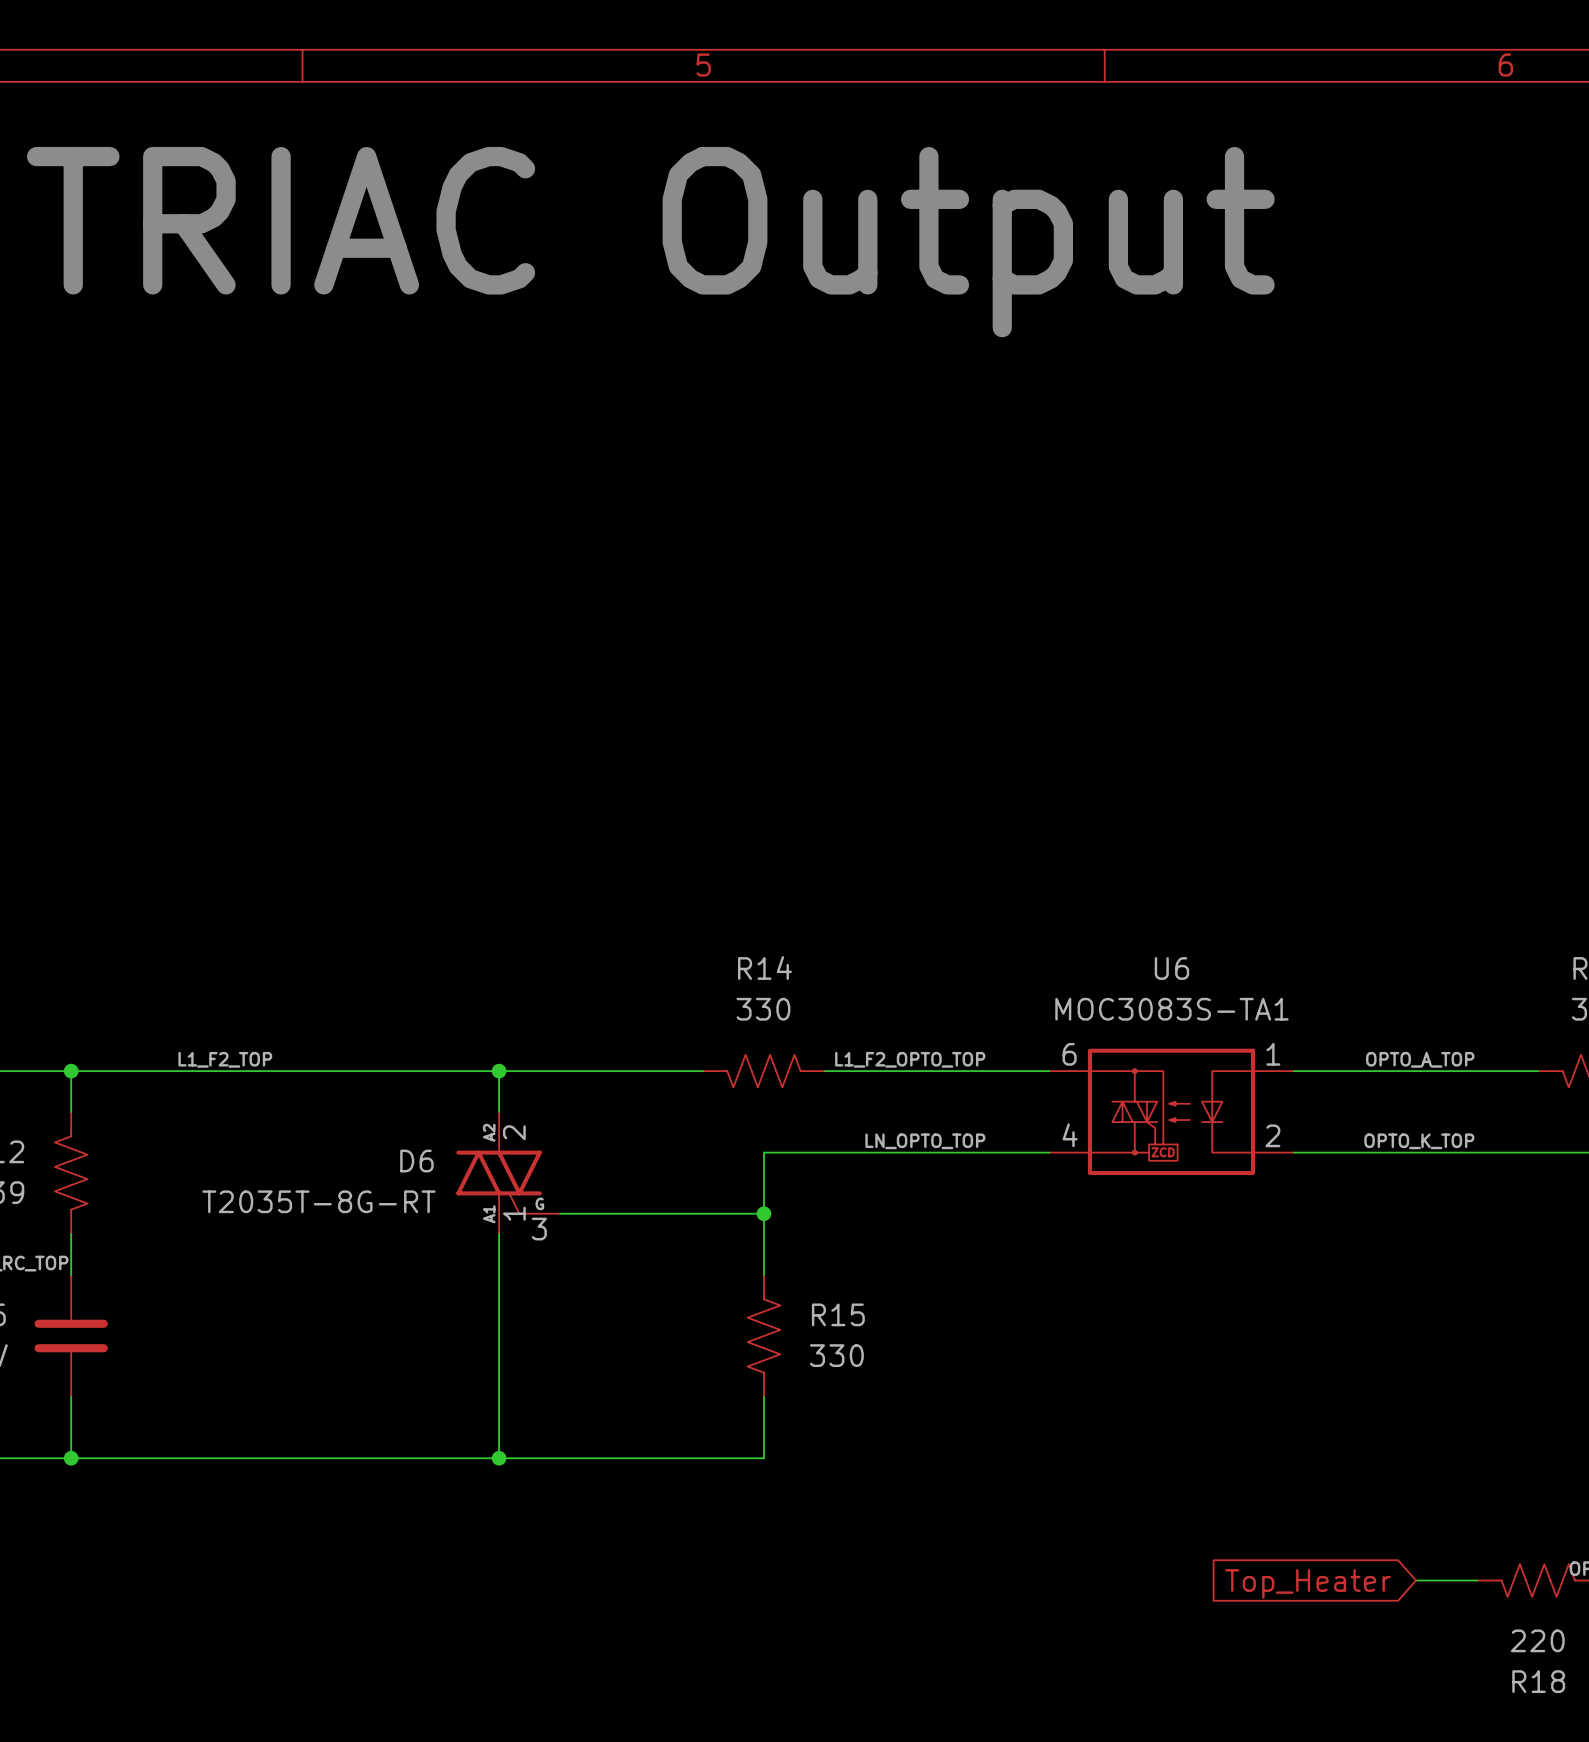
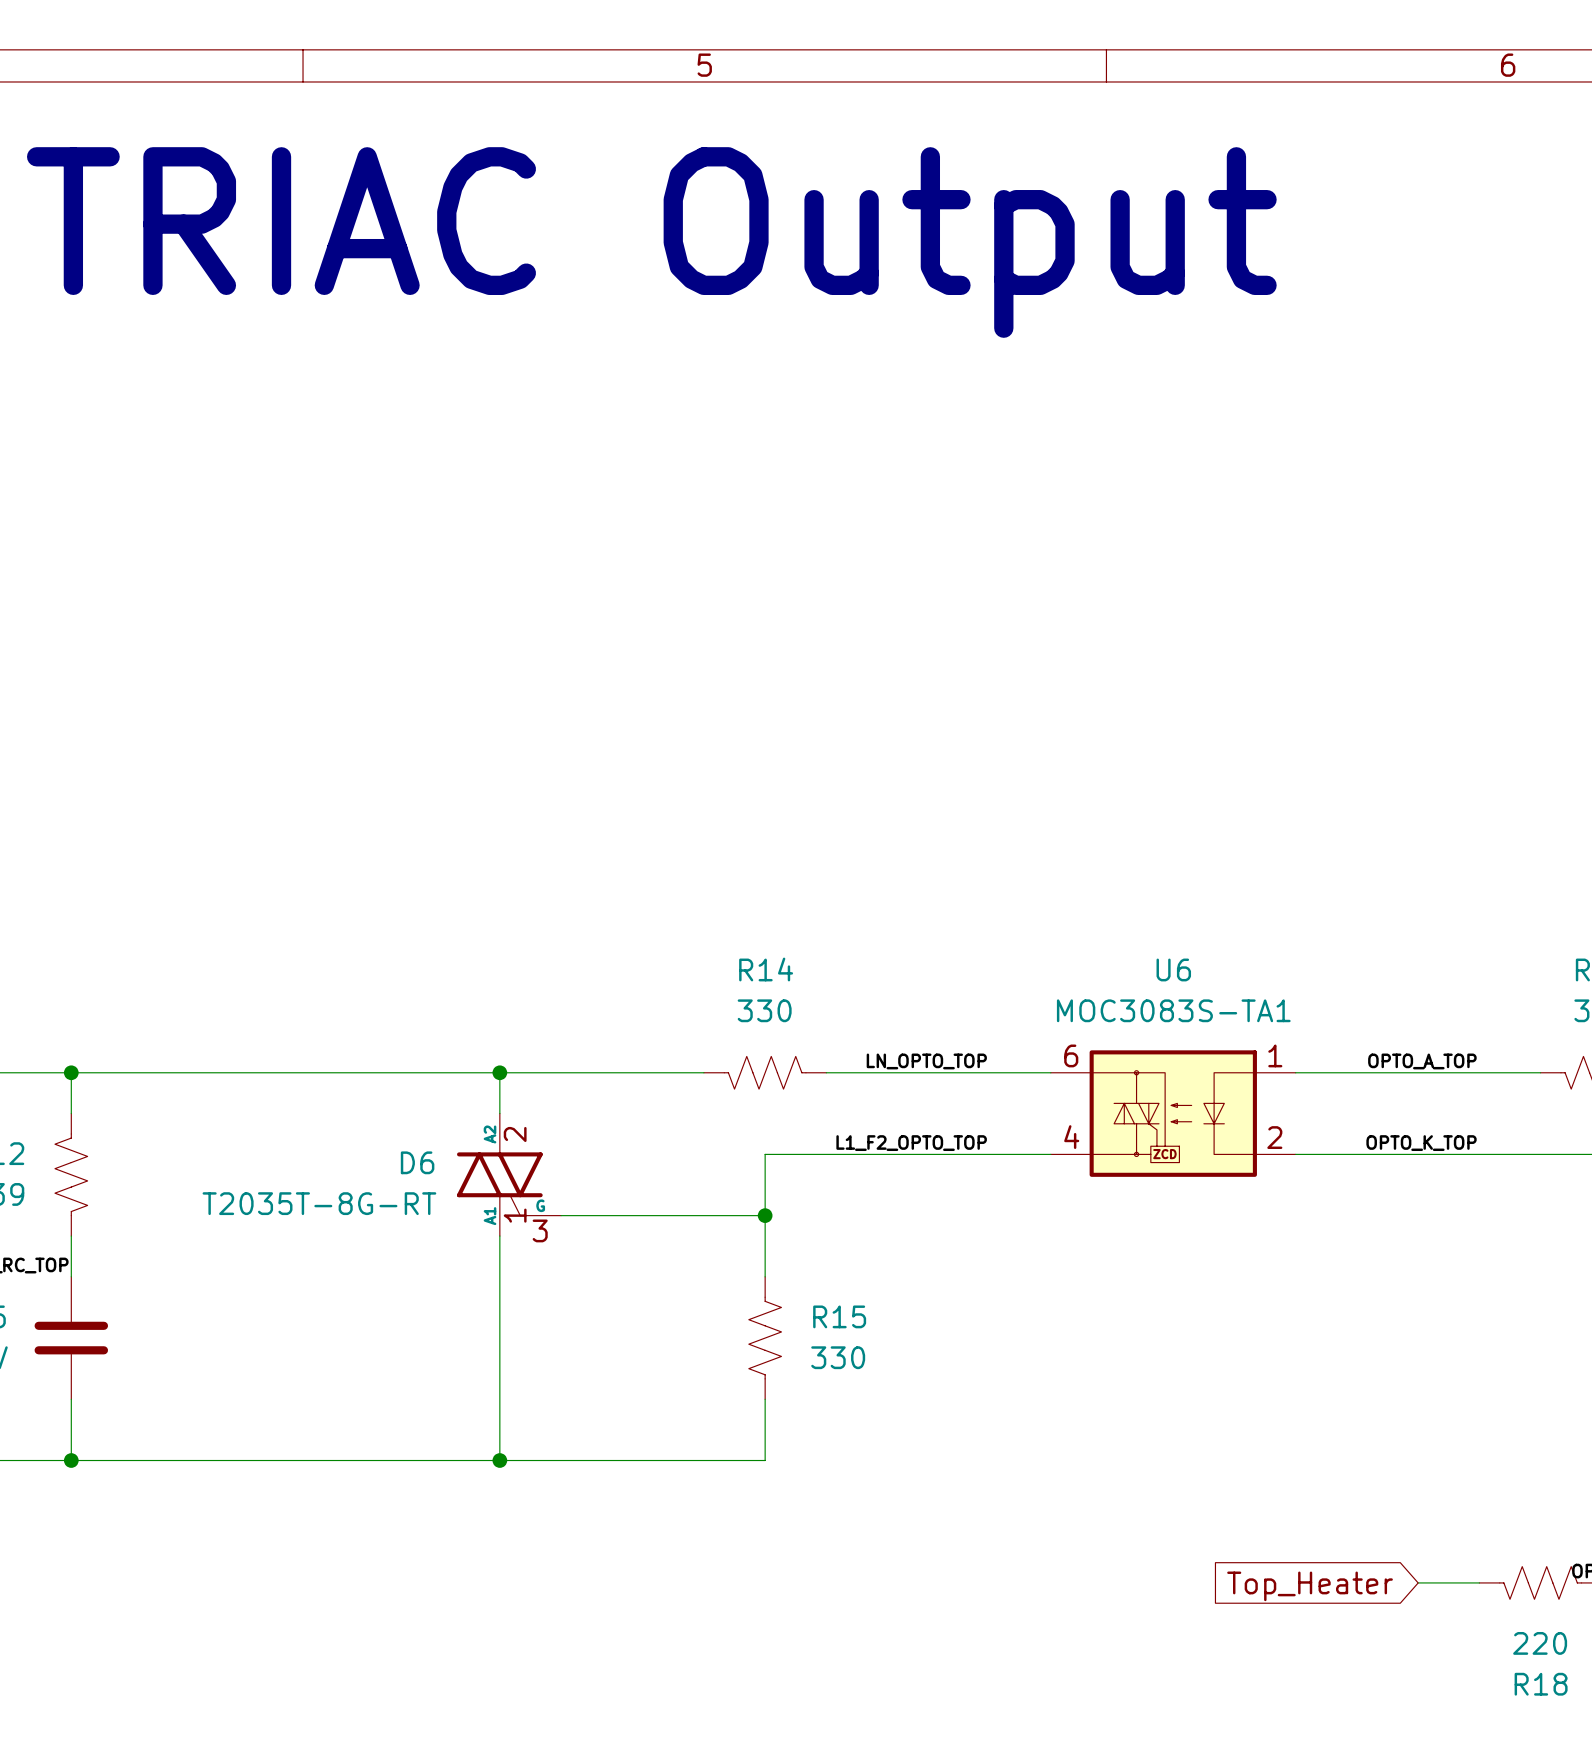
label: L1_F2_TOP (225, 1059) -> none
label: L1_F2_OPTO_TOP (910, 1059) -> LN_OPTO_TOP (926, 1061)
label: LN_OPTO_TOP (925, 1141) -> L1_F2_OPTO_TOP (911, 1143)

